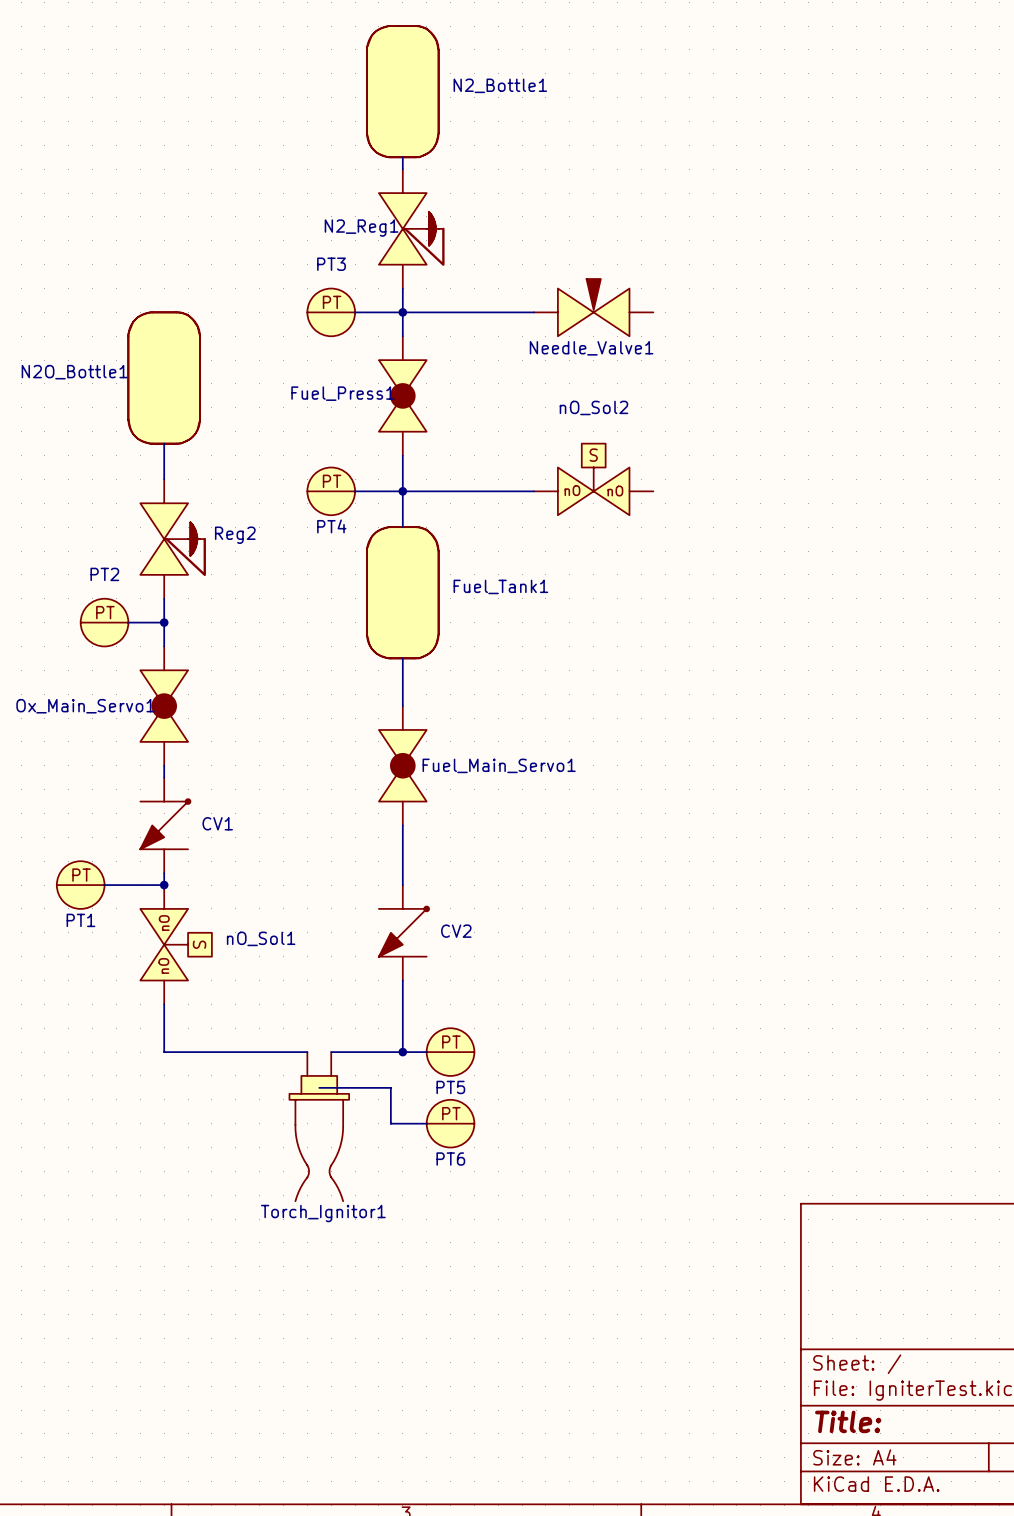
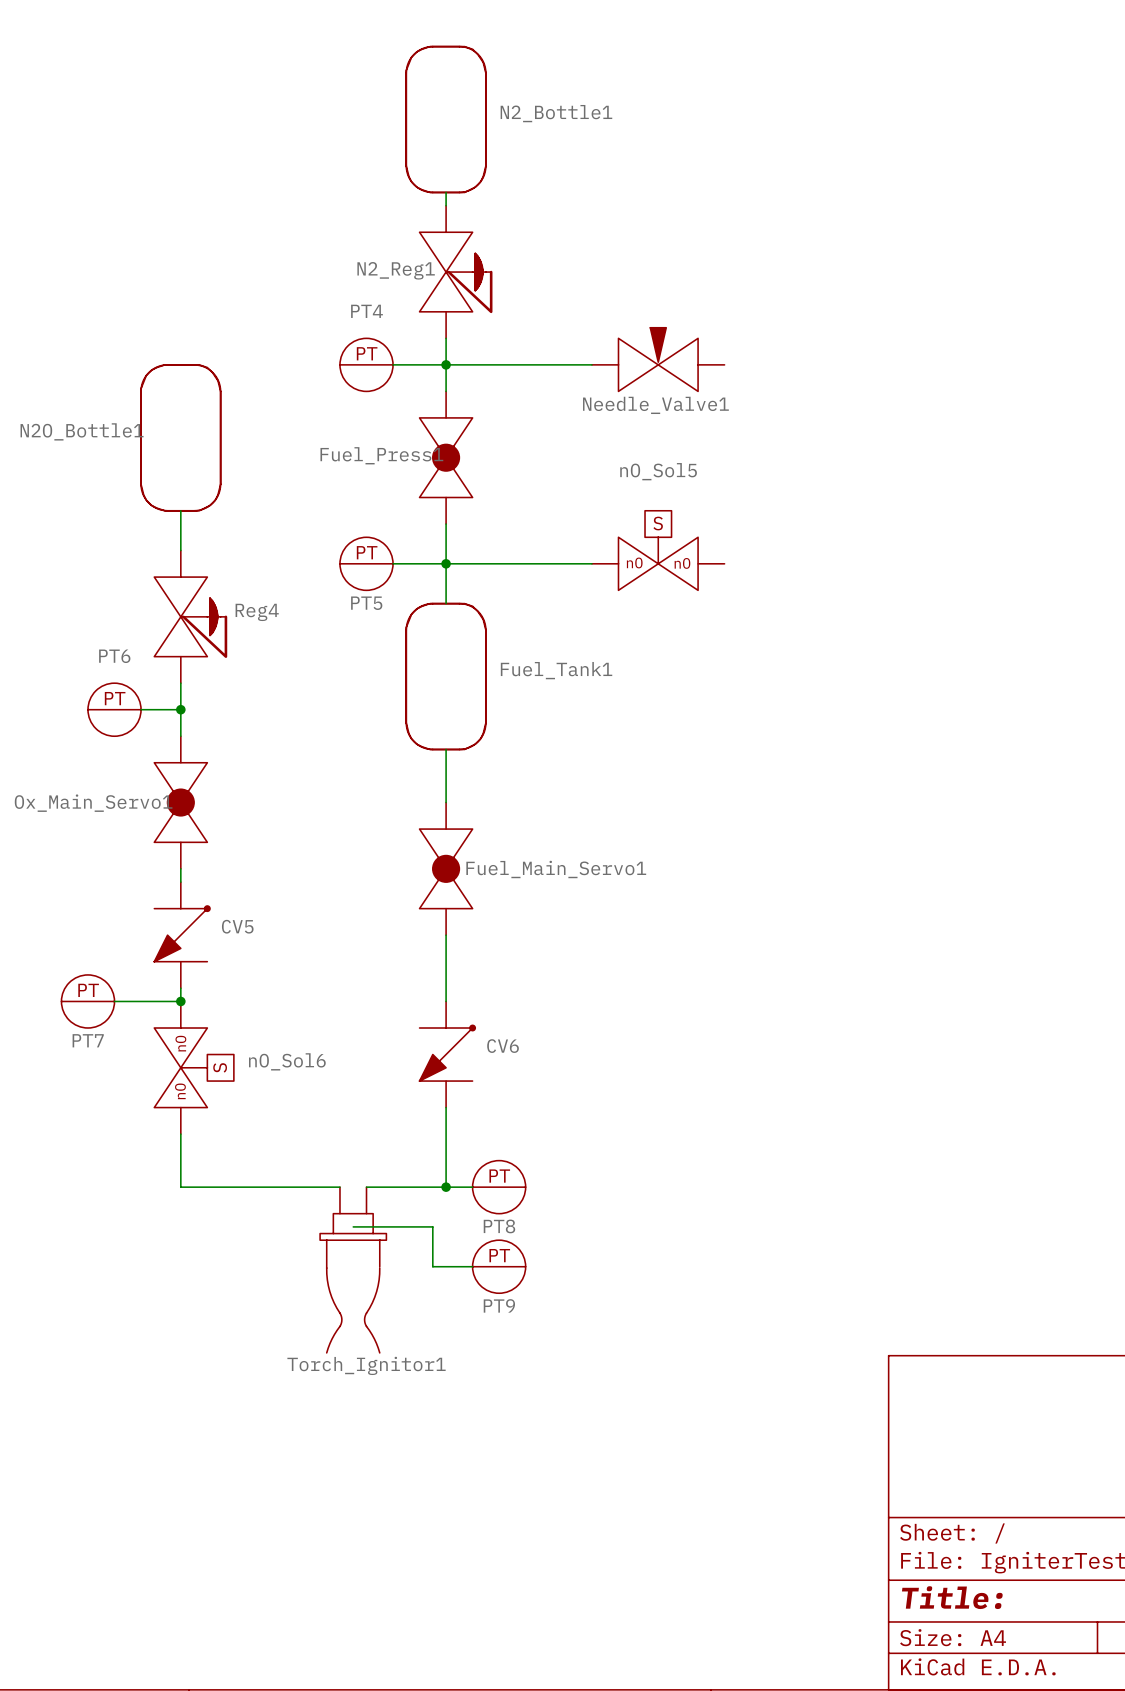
PT3 name: PT3 (331, 264) -> PT4 (367, 311)
nO_Sol2 name: nO_Sol2 (593, 407) -> nO_Sol5 (658, 471)
PT4 name: PT4 (331, 526) -> PT5 (366, 603)
Reg2 name: Reg2 (235, 535) -> Reg4 (257, 612)
PT2 name: PT2 (104, 574) -> PT6 (114, 656)
CV1 name: CV1 (217, 823) -> CV5 (237, 926)
PT1 name: PT1 (80, 920) -> PT7 (88, 1040)
CV2 name: CV2 (456, 931) -> CV6 (503, 1046)
nO_Sol1 name: nO_Sol1 (261, 938) -> nO_Sol6 (287, 1061)
PT5 name: PT5 (450, 1087) -> PT8 (499, 1226)
PT6 name: PT6 (450, 1159) -> PT9 (499, 1305)

